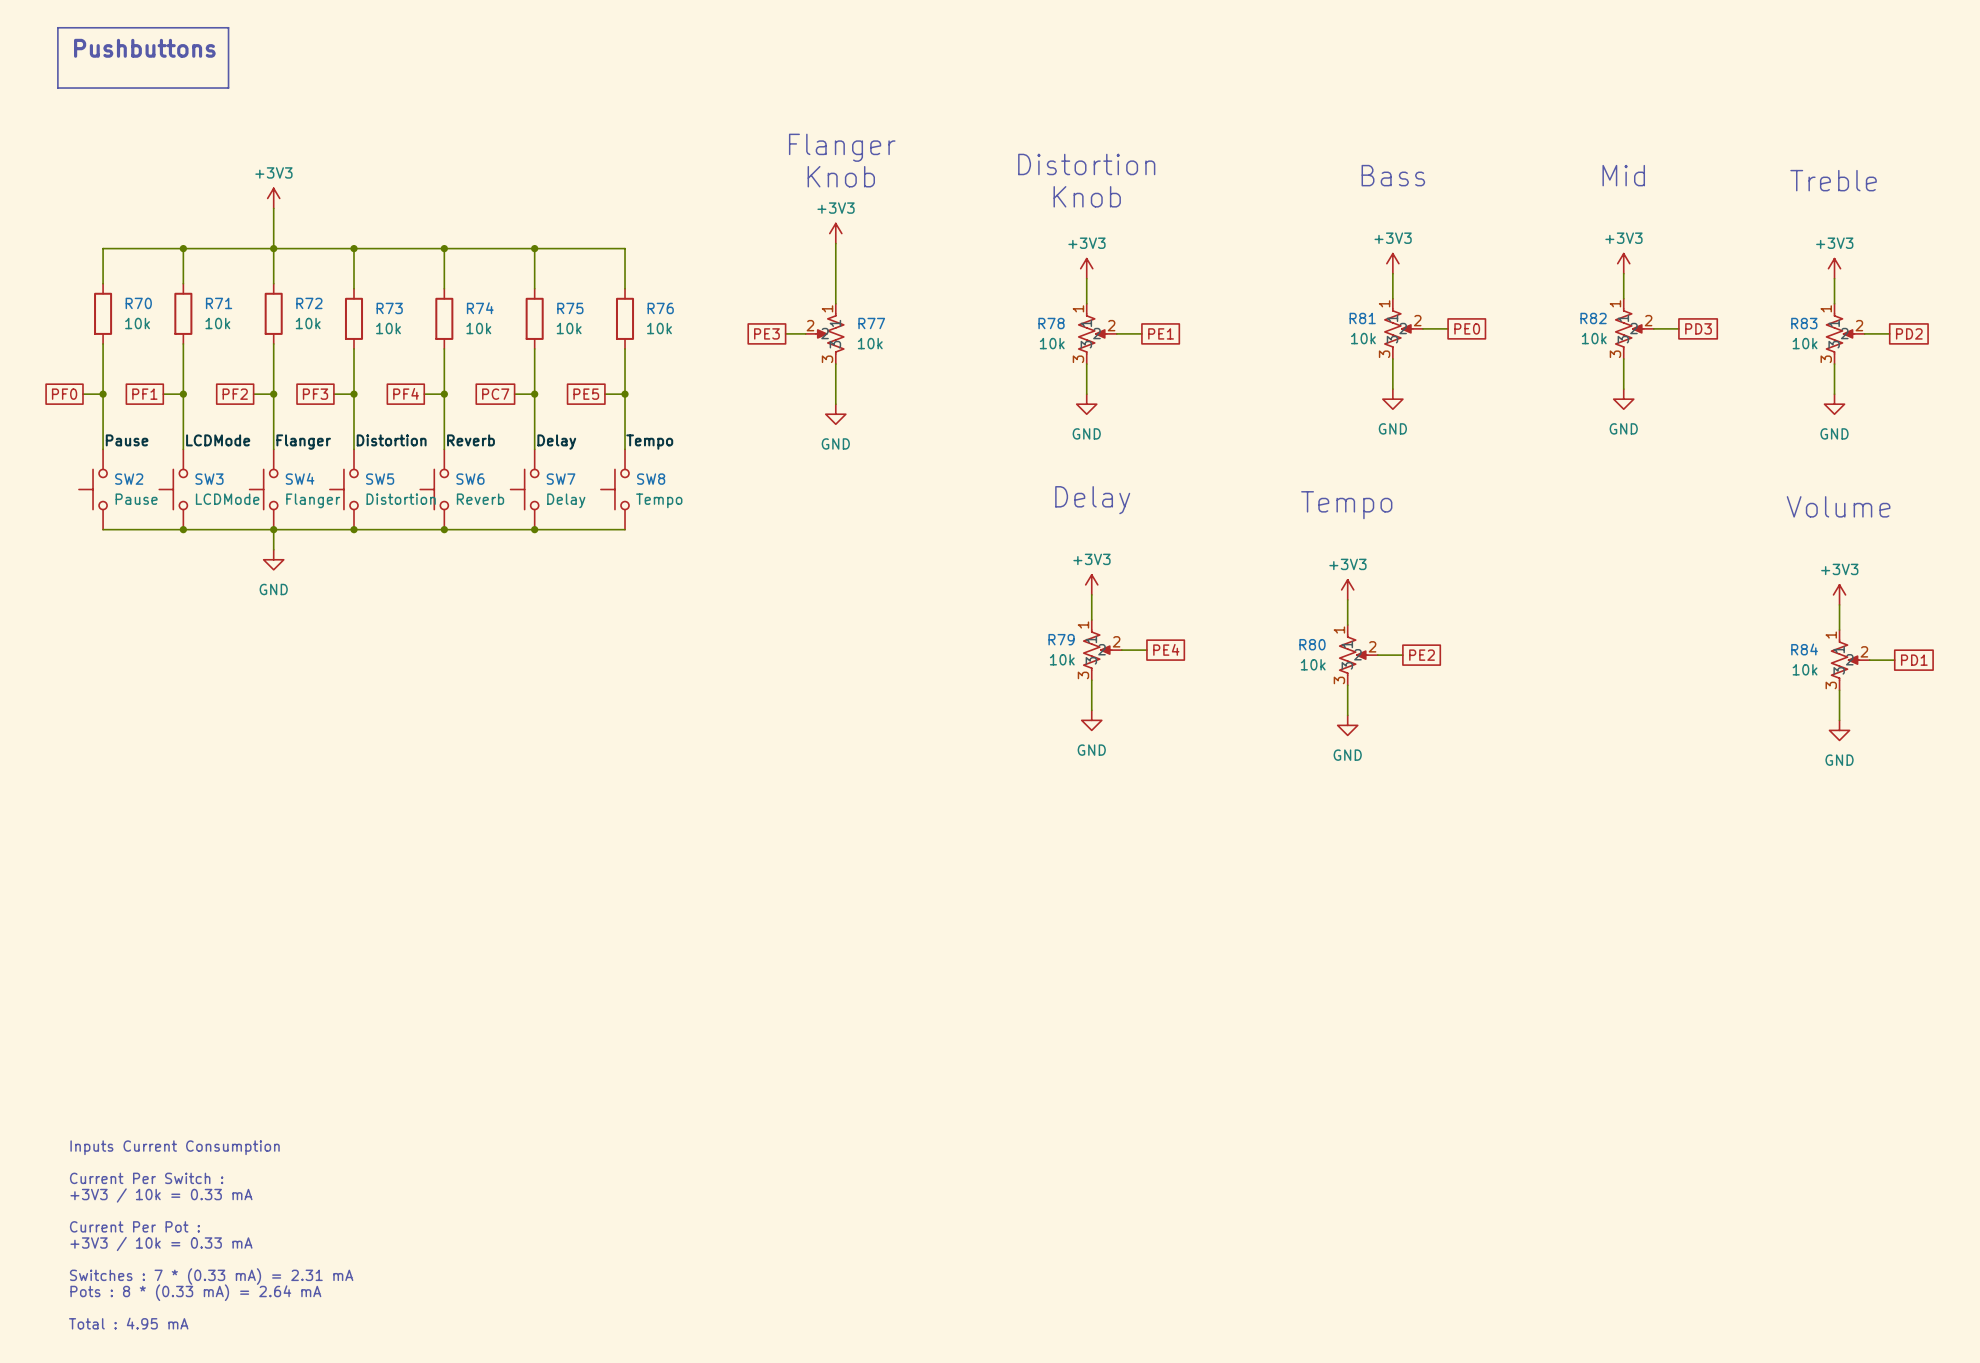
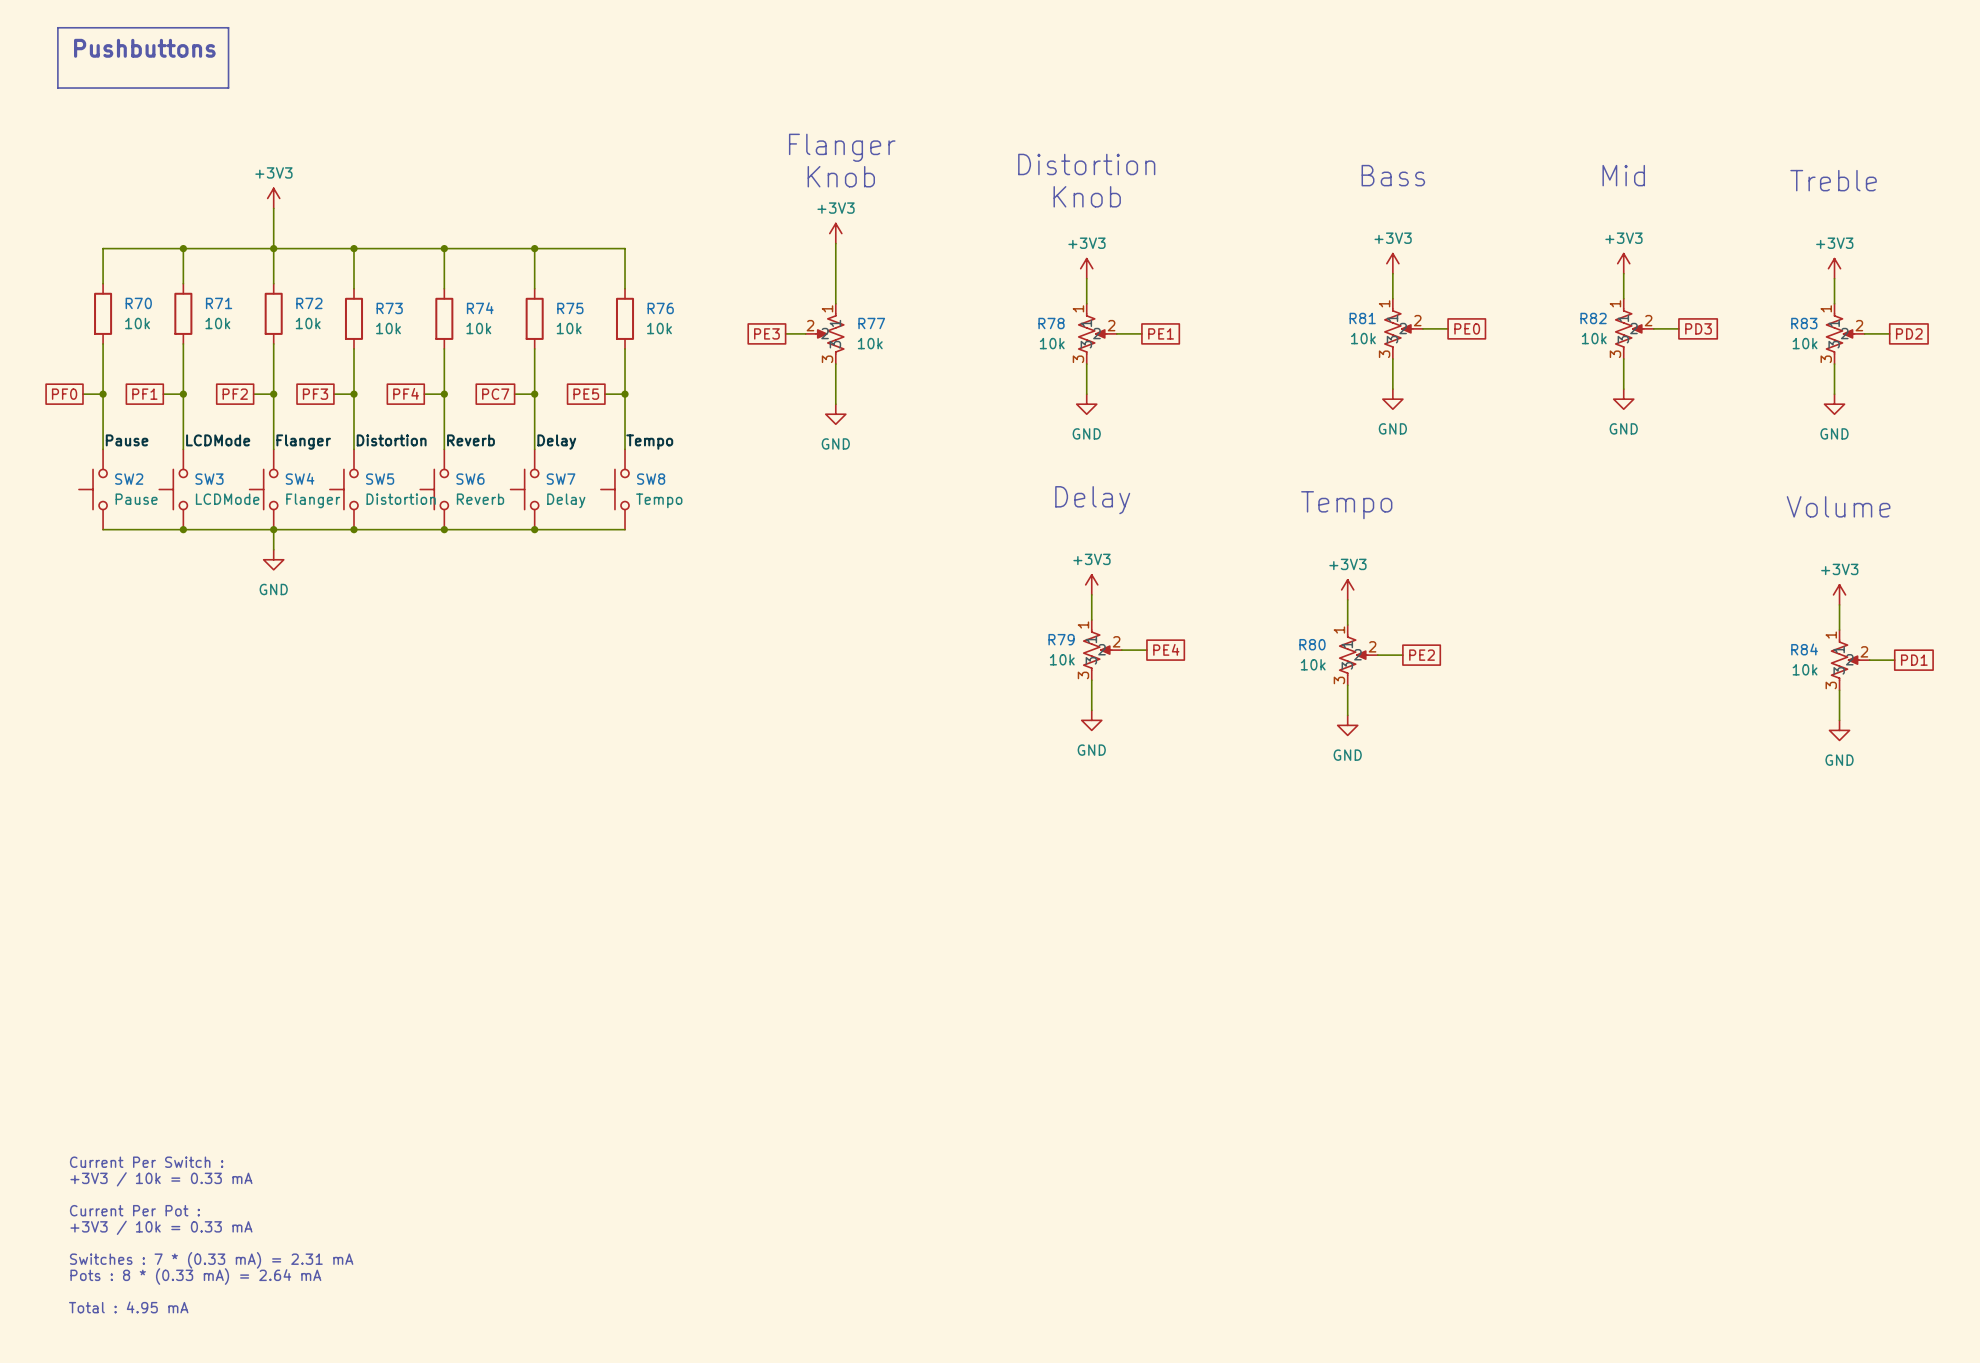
text: Inputs Current Consumption (175, 1147) -> none
text: none -> Current Per Switch : (146, 1162)
text: Current Per Switch : (146, 1178) -> +3V3 / 10k = 0.33 mA (161, 1179)
text: +3V3 / 10k = 0.33 mA (161, 1195) -> none
text: none -> Current Per Pot : (134, 1210)
text: Current Per Pot : (134, 1226) -> +3V3 / 10k = 0.33 mA (161, 1227)
text: +3V3 / 10k = 0.33 mA (161, 1243) -> none
text: none -> Switches : 7 * (0.33 mA) = 2.31 mA (211, 1260)
text: Switches : 7 * (0.33 mA) = 2.31 mA (211, 1276) -> Pots : 8 * (0.33 mA) = 2.64 mA (195, 1276)
text: Pots : 8 * (0.33 mA) = 2.64 mA (195, 1292) -> none
text position: Total : 4.95 mA (128, 1323) -> Total : 4.95 mA (128, 1307)

